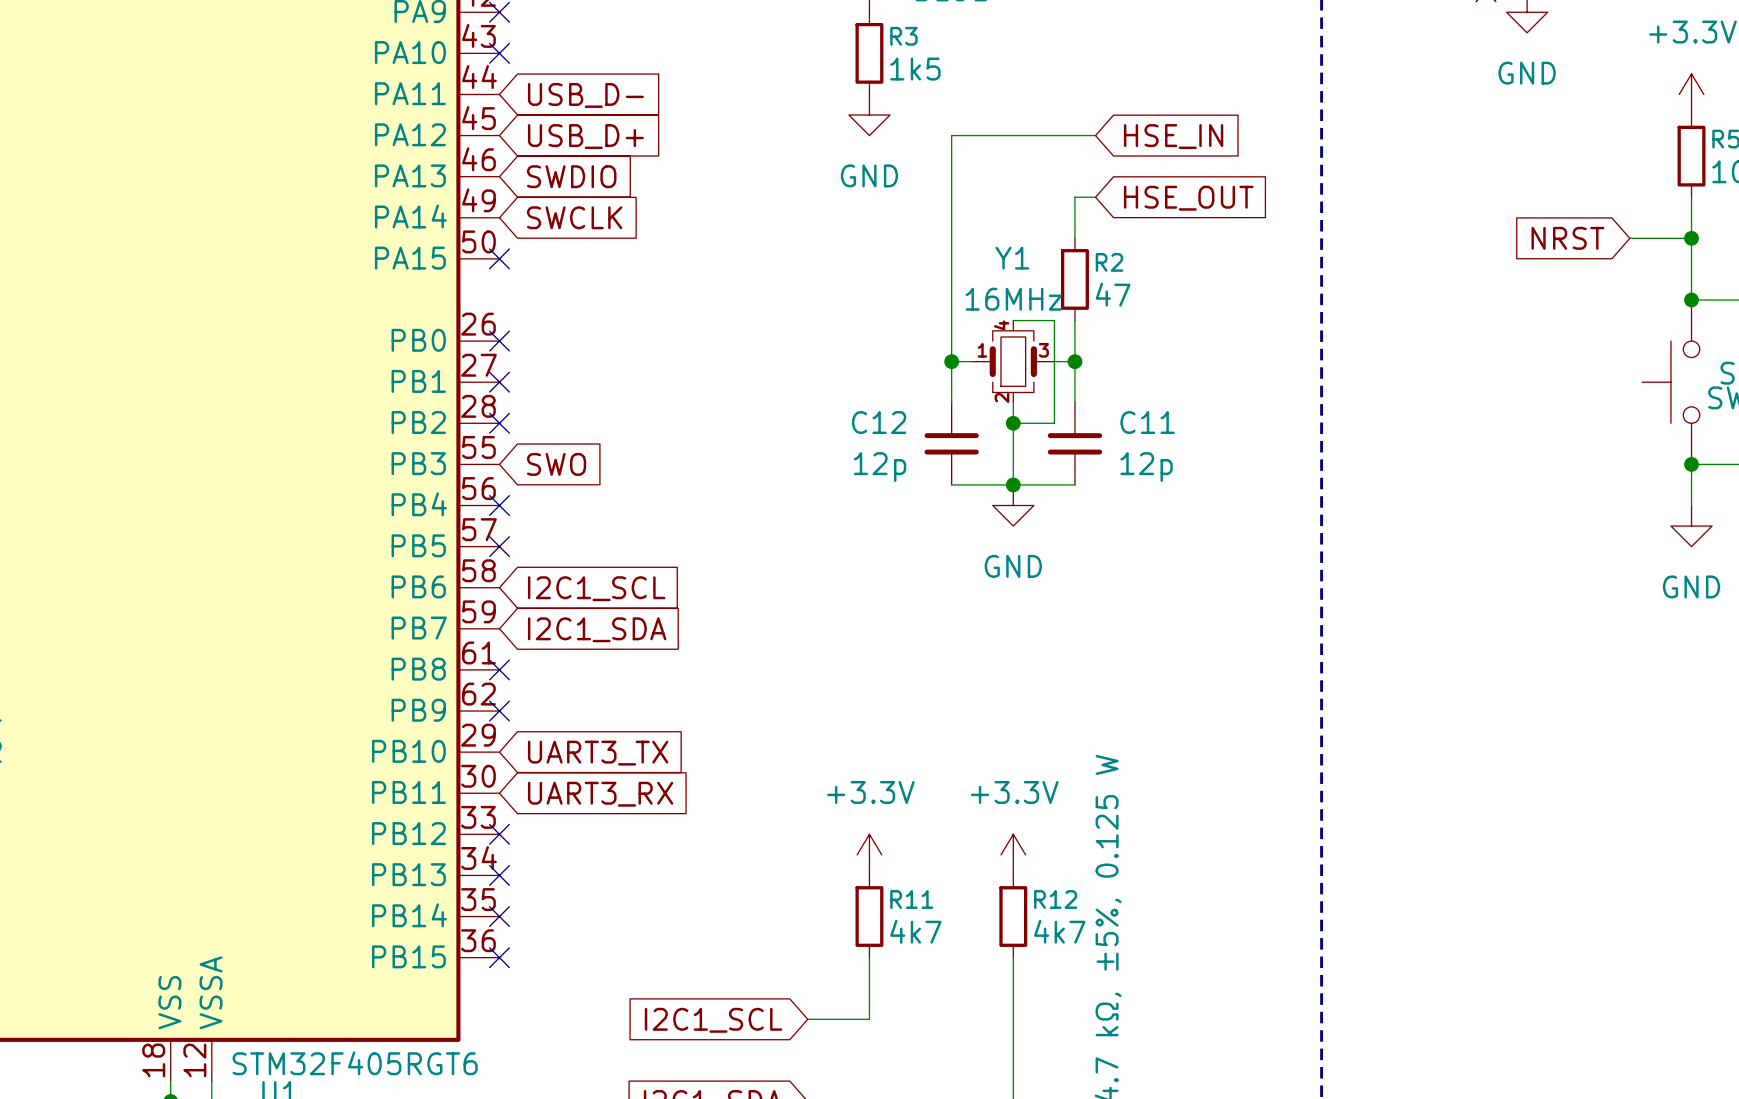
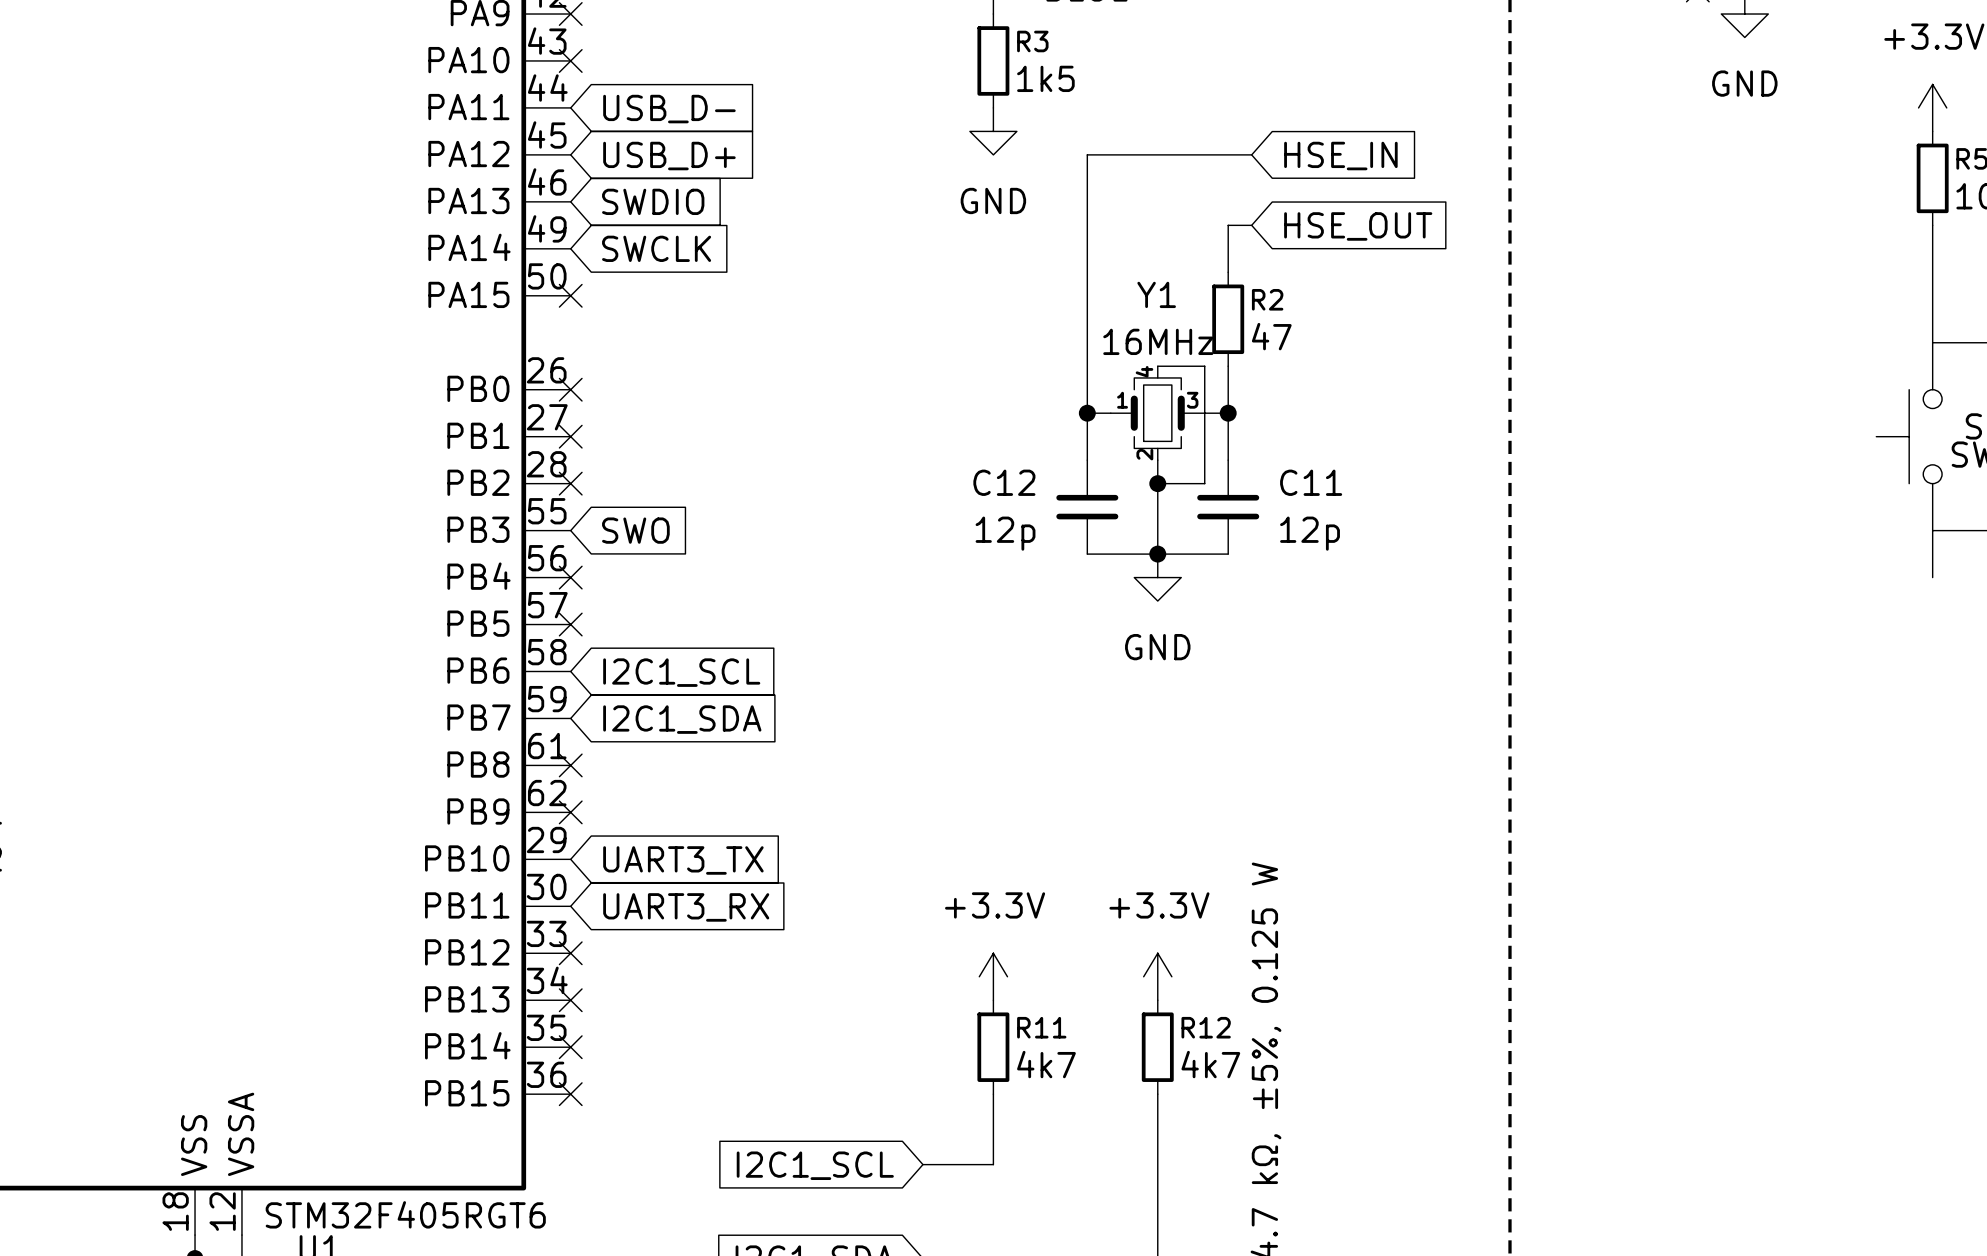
global label: NRST (1567, 238) -> none
wire: (1629, 238) (1691, 238) -> none
junction: (1691, 238) -> none
junction: (1691, 299) -> none
junction: (1691, 464) -> none
power symbol: GND (1691, 526) -> none

